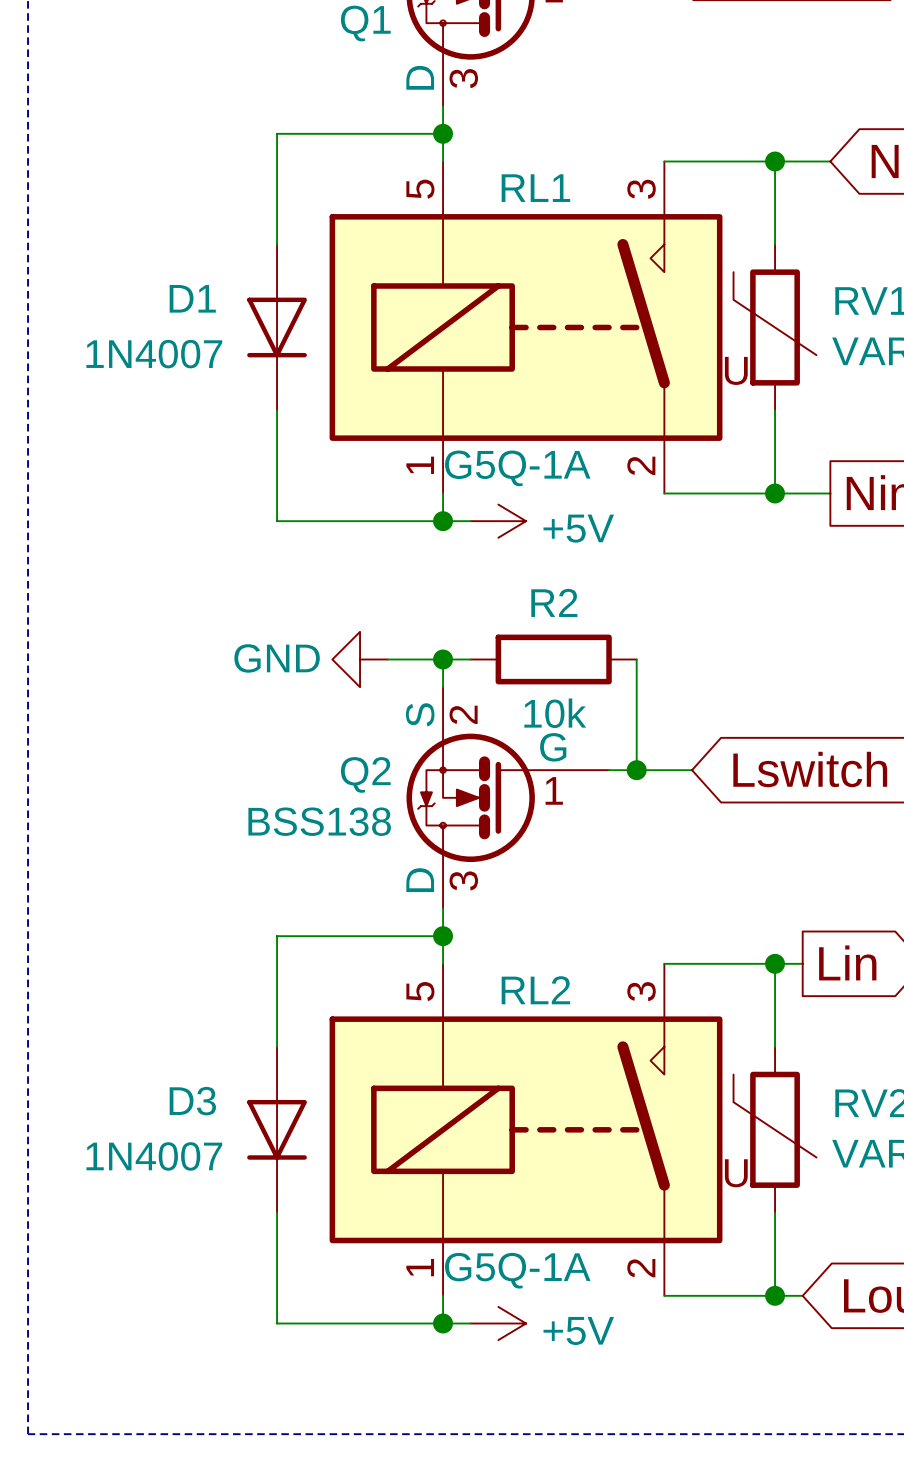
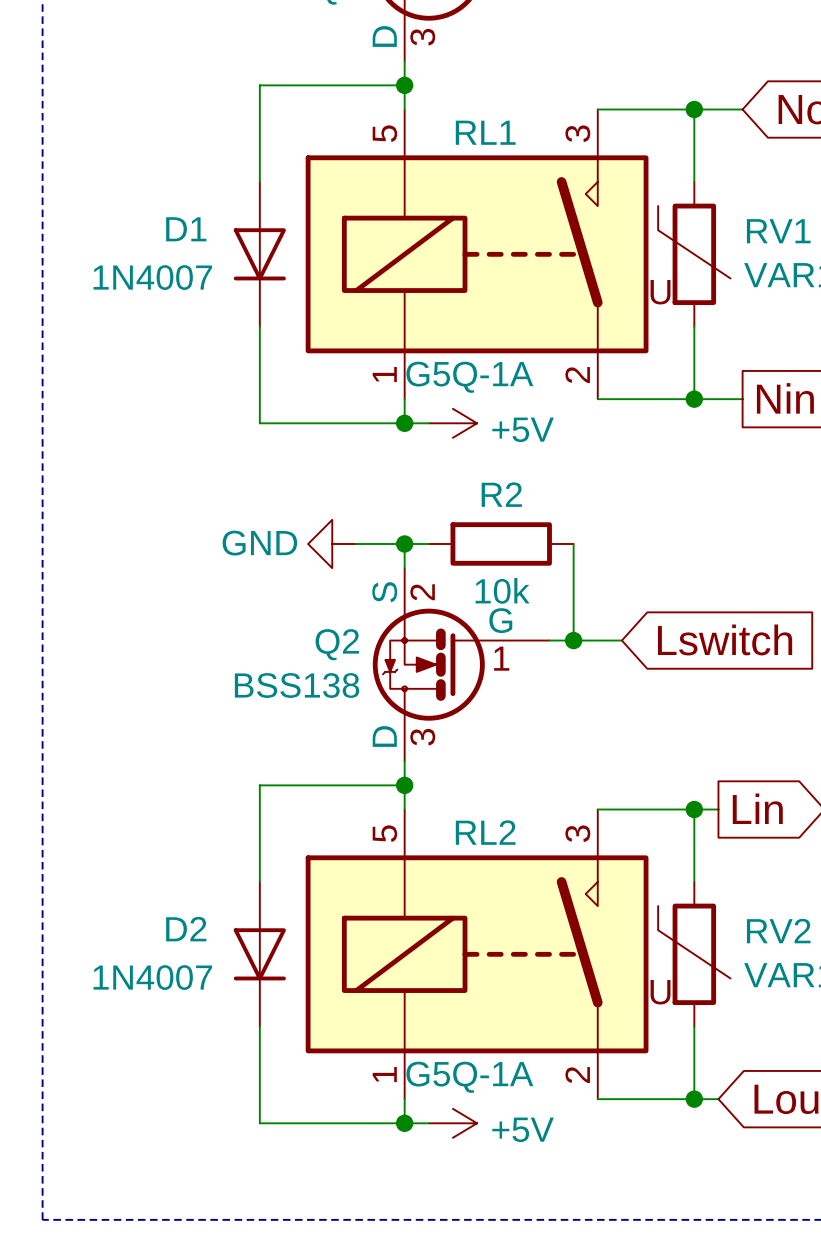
D3 name: D3 (192, 1101) -> D2 (186, 929)

